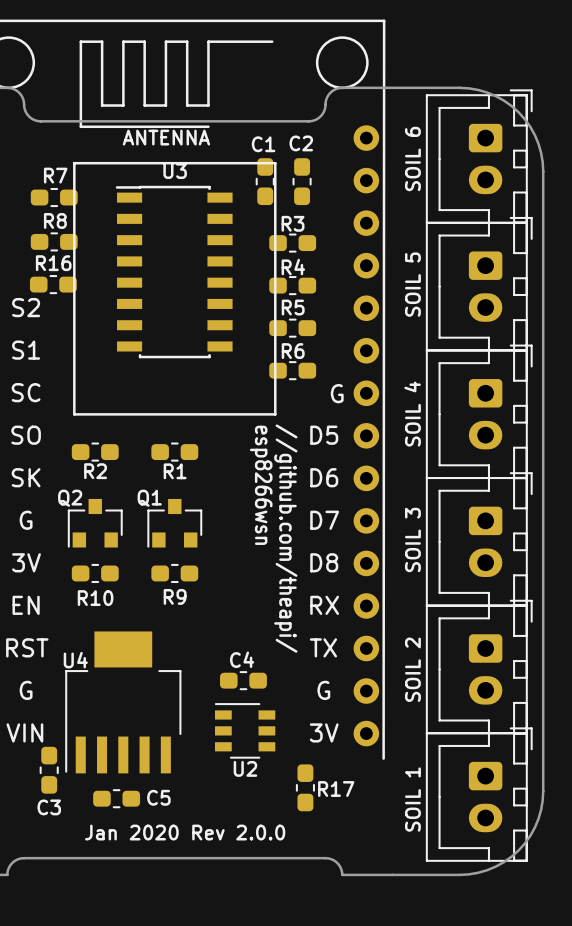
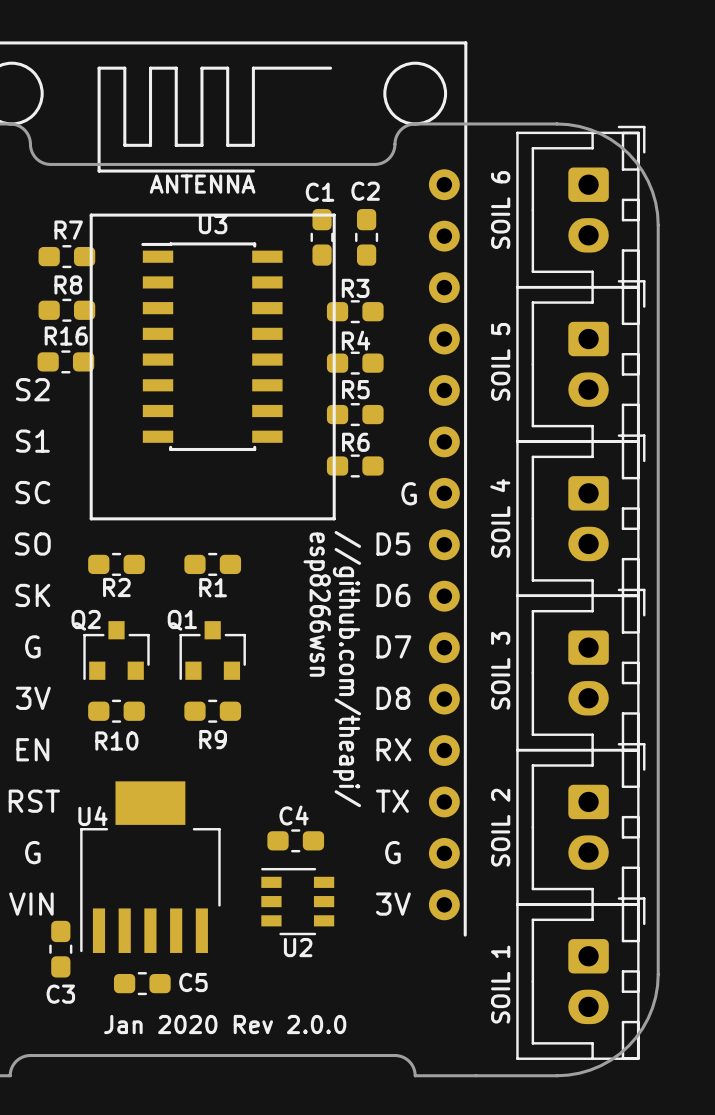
R17: (305, 787) -> none

